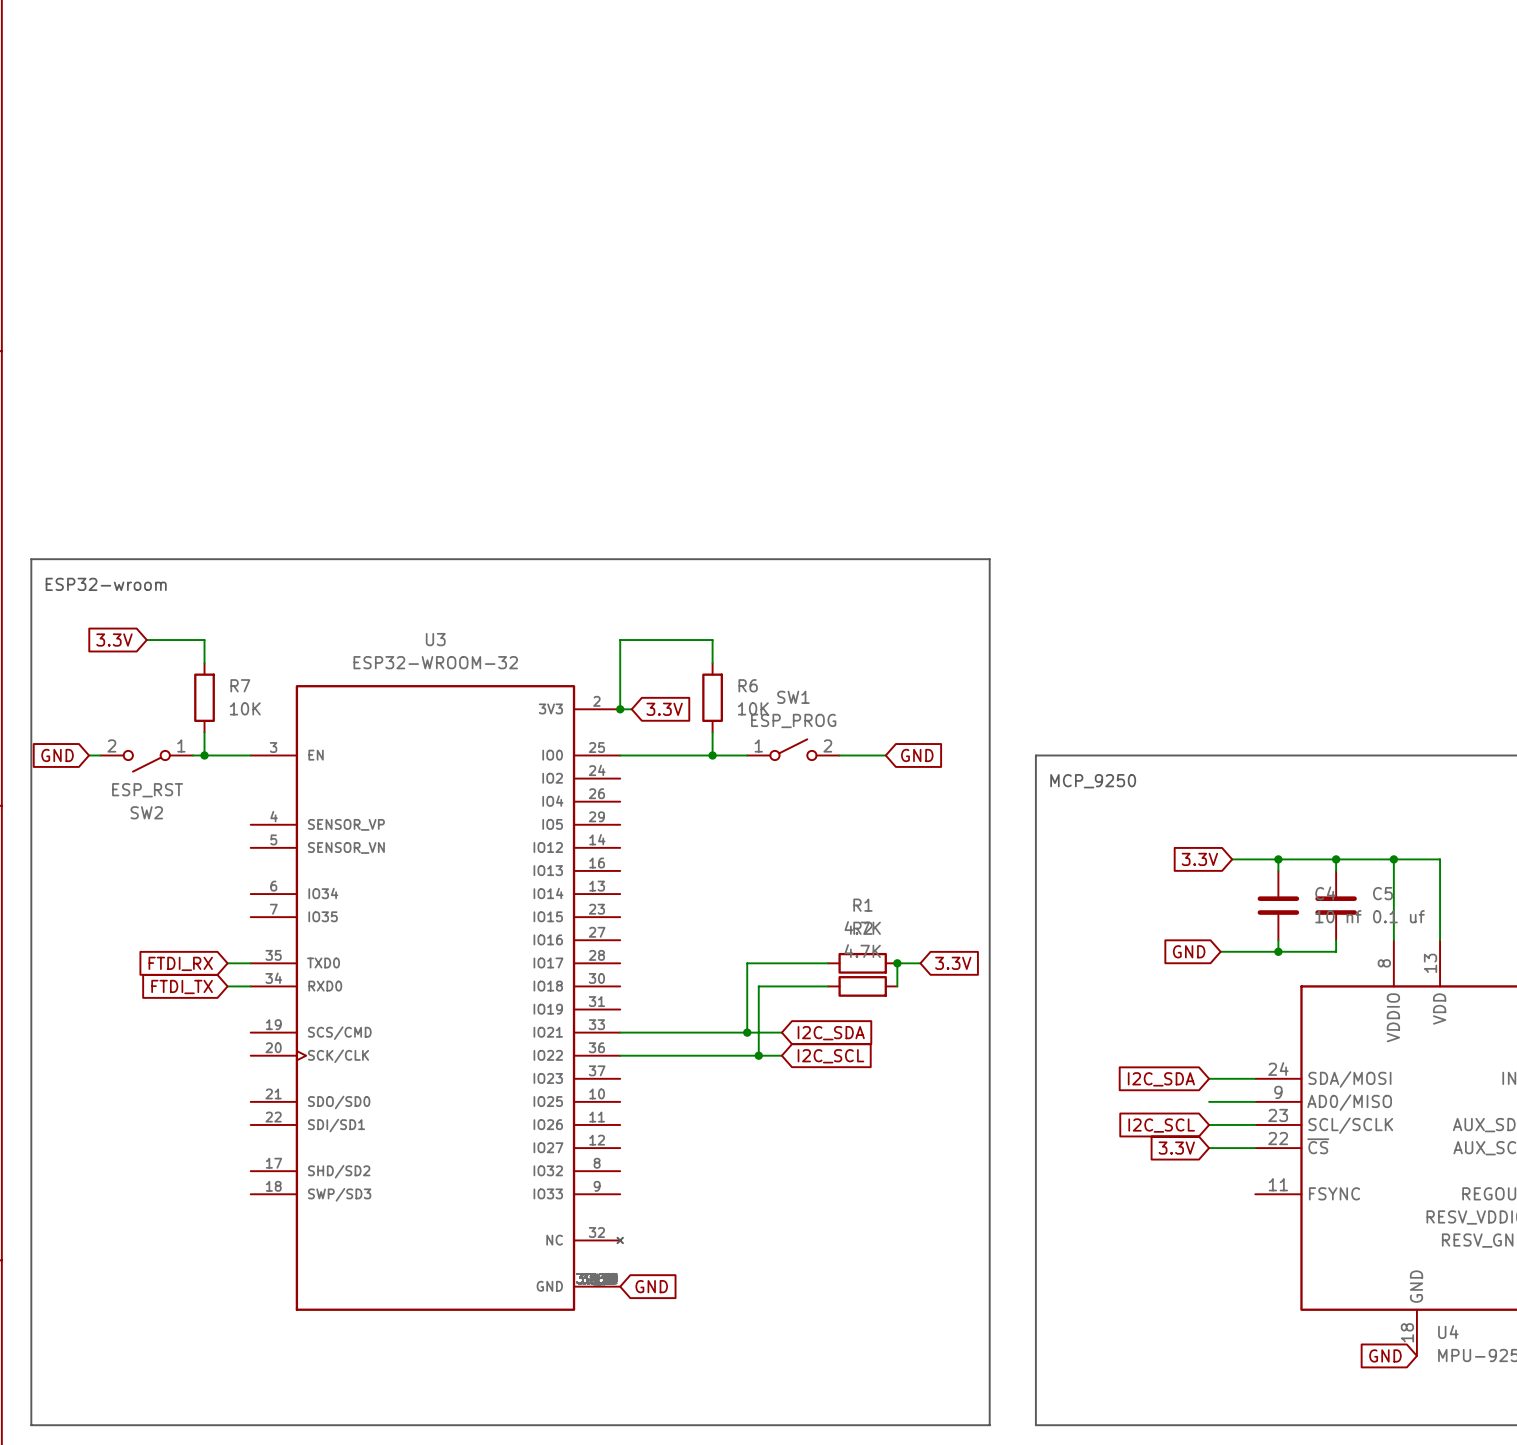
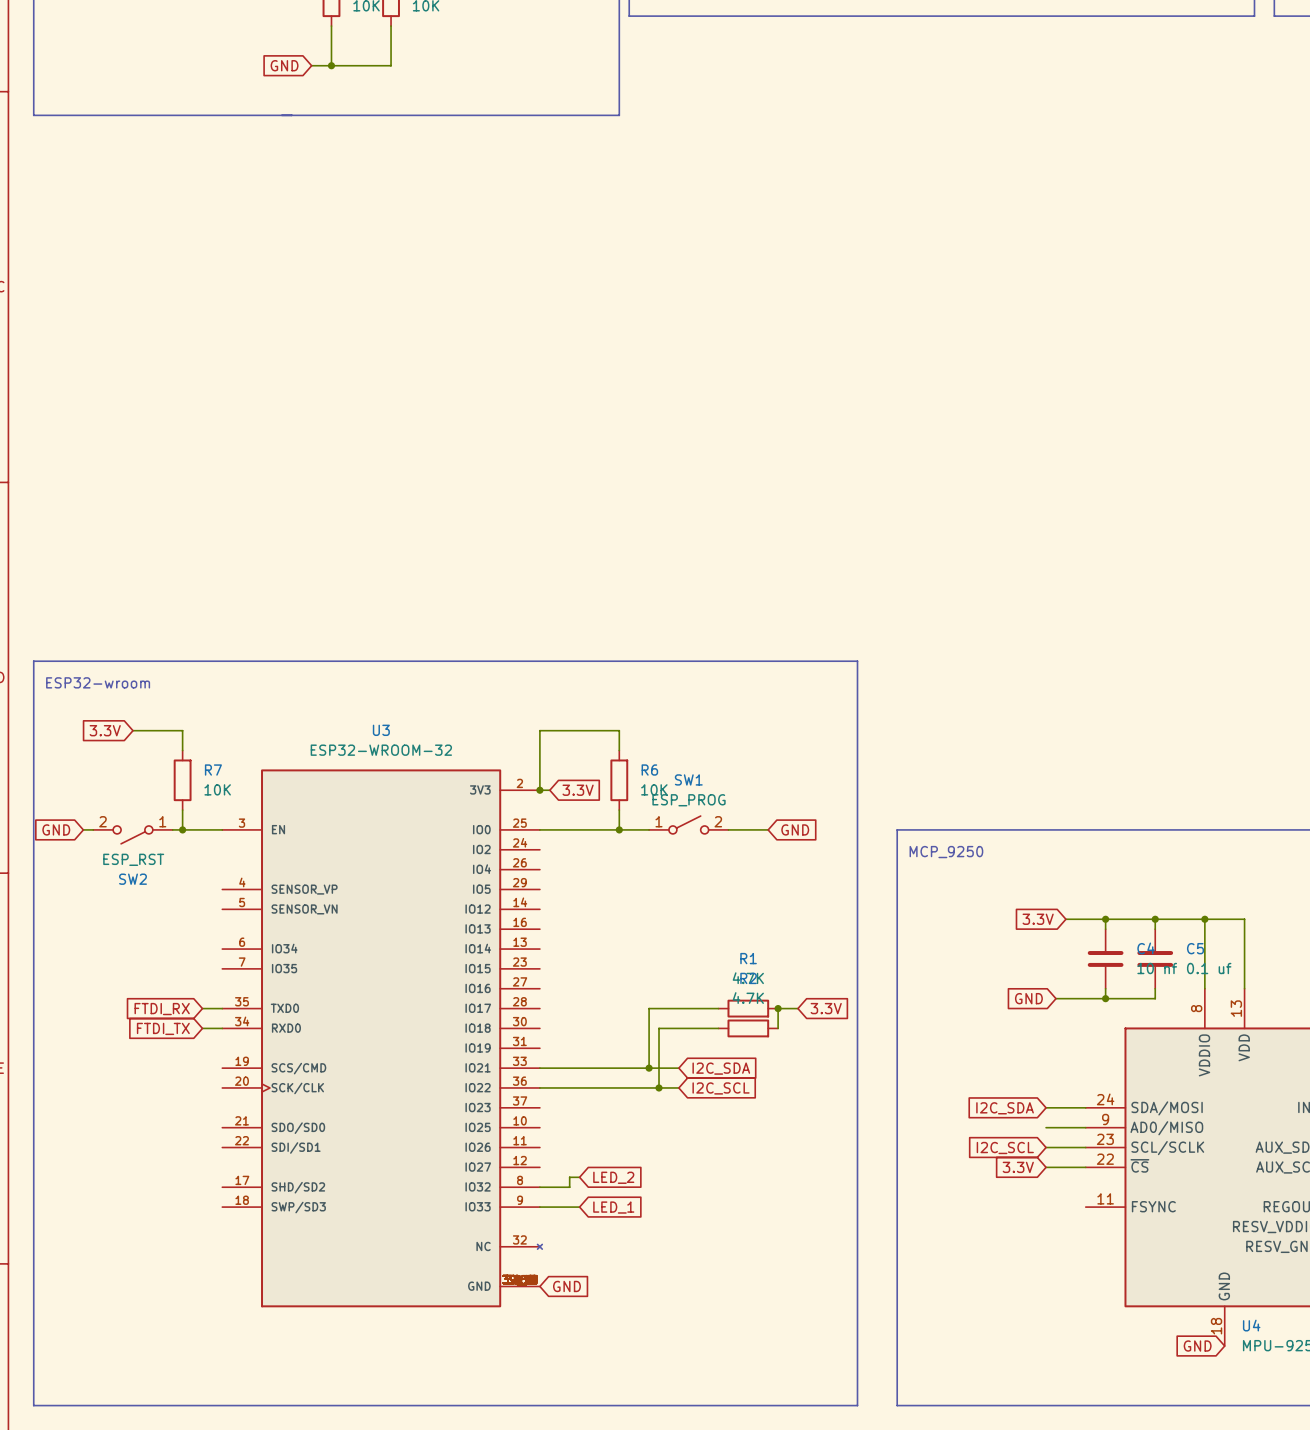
wire: none -> (579, 1177) (569, 1177) (569, 1187) (539, 1187)
global label: none -> LED_2 (613, 1177)
wire: none -> (539, 1207) (579, 1207)
global label: none -> LED_1 (613, 1207)

